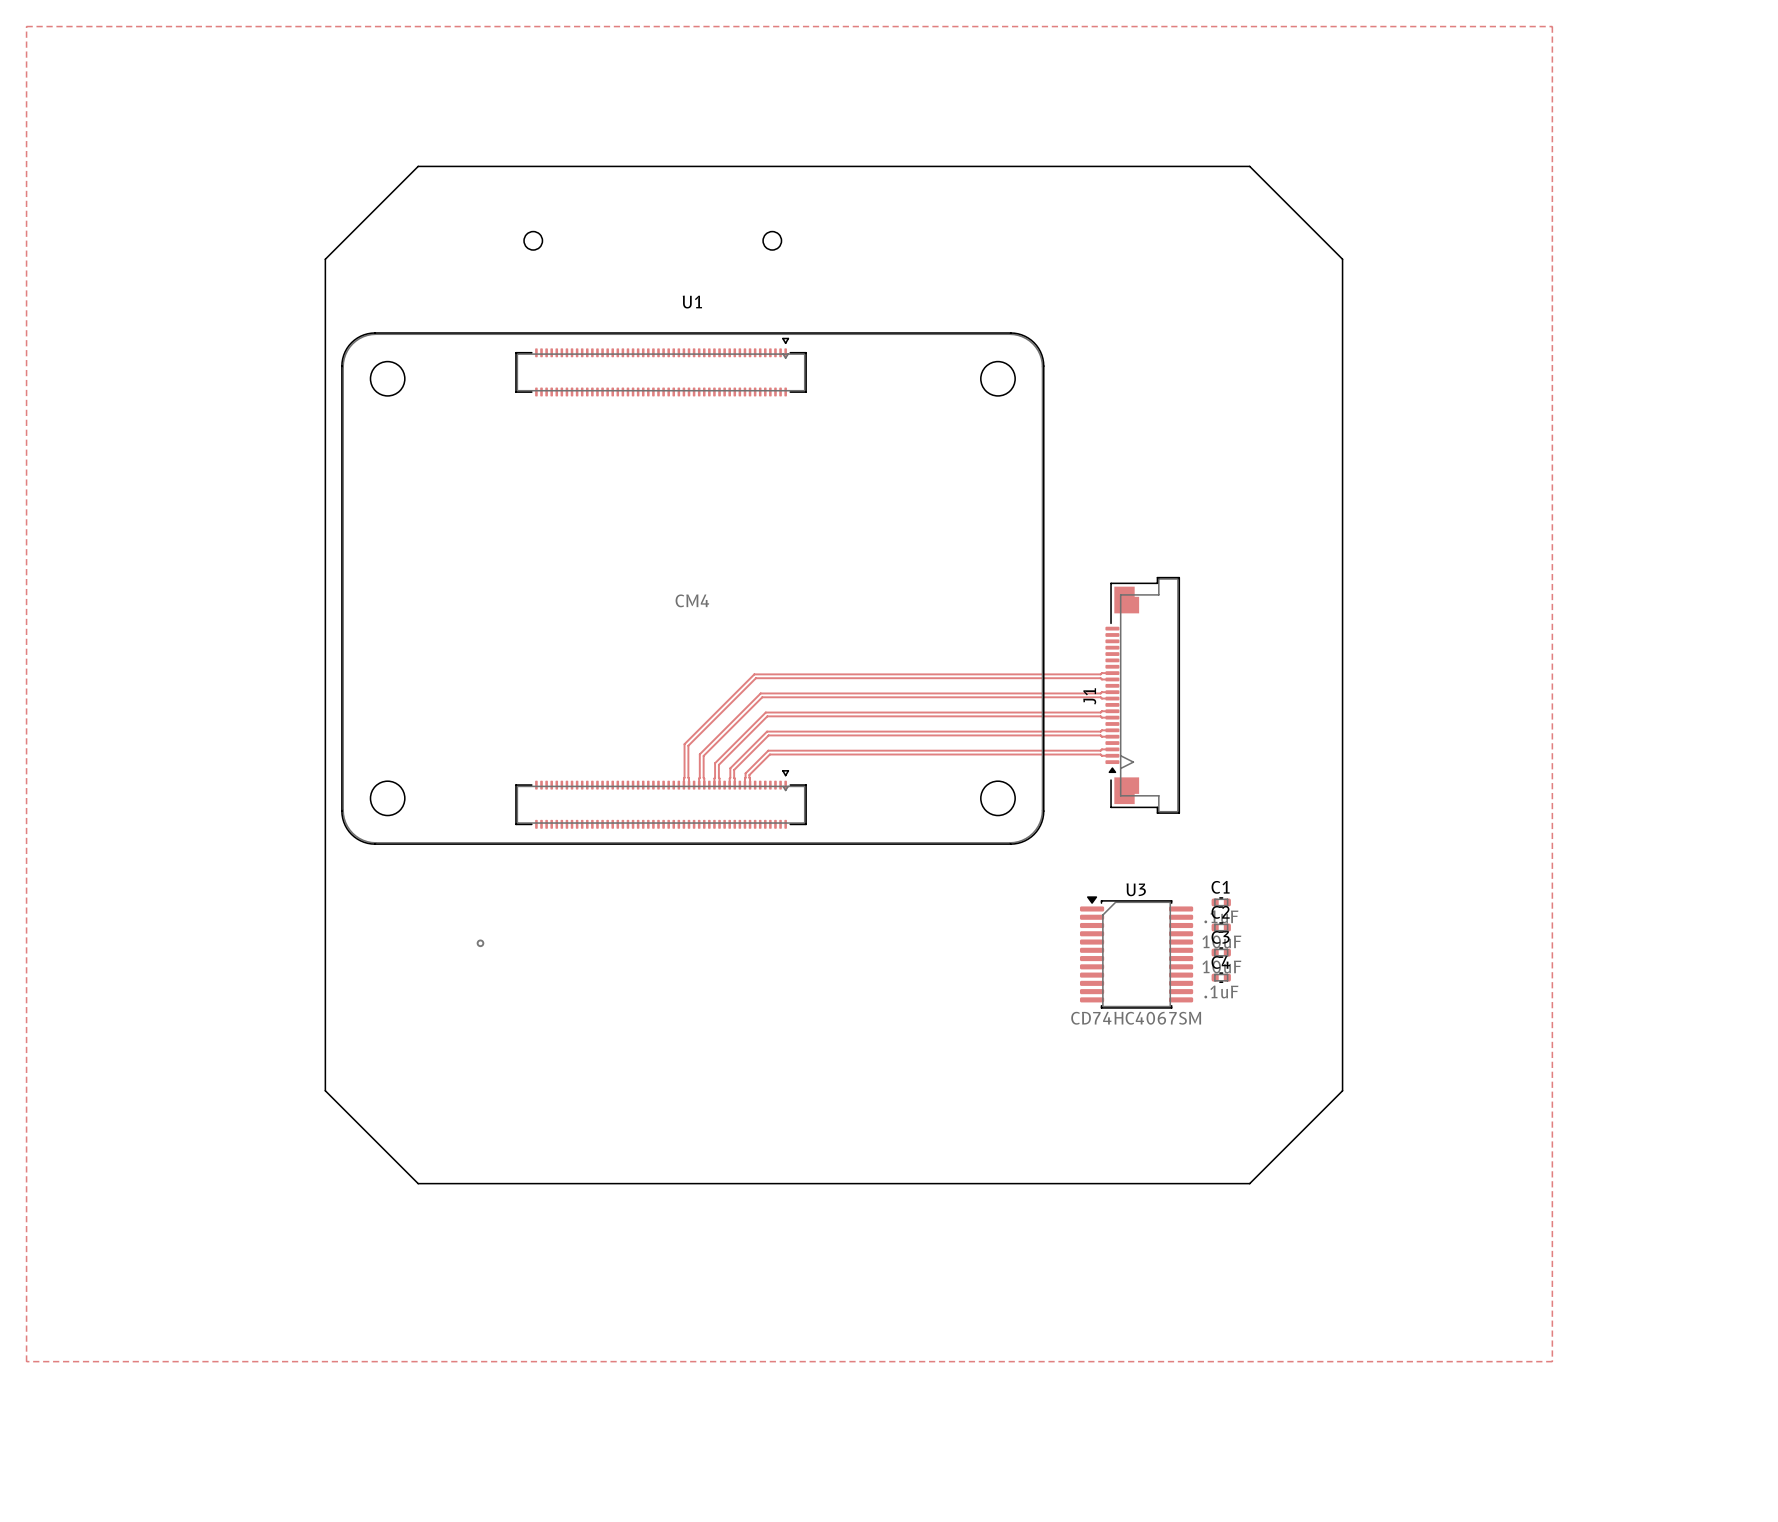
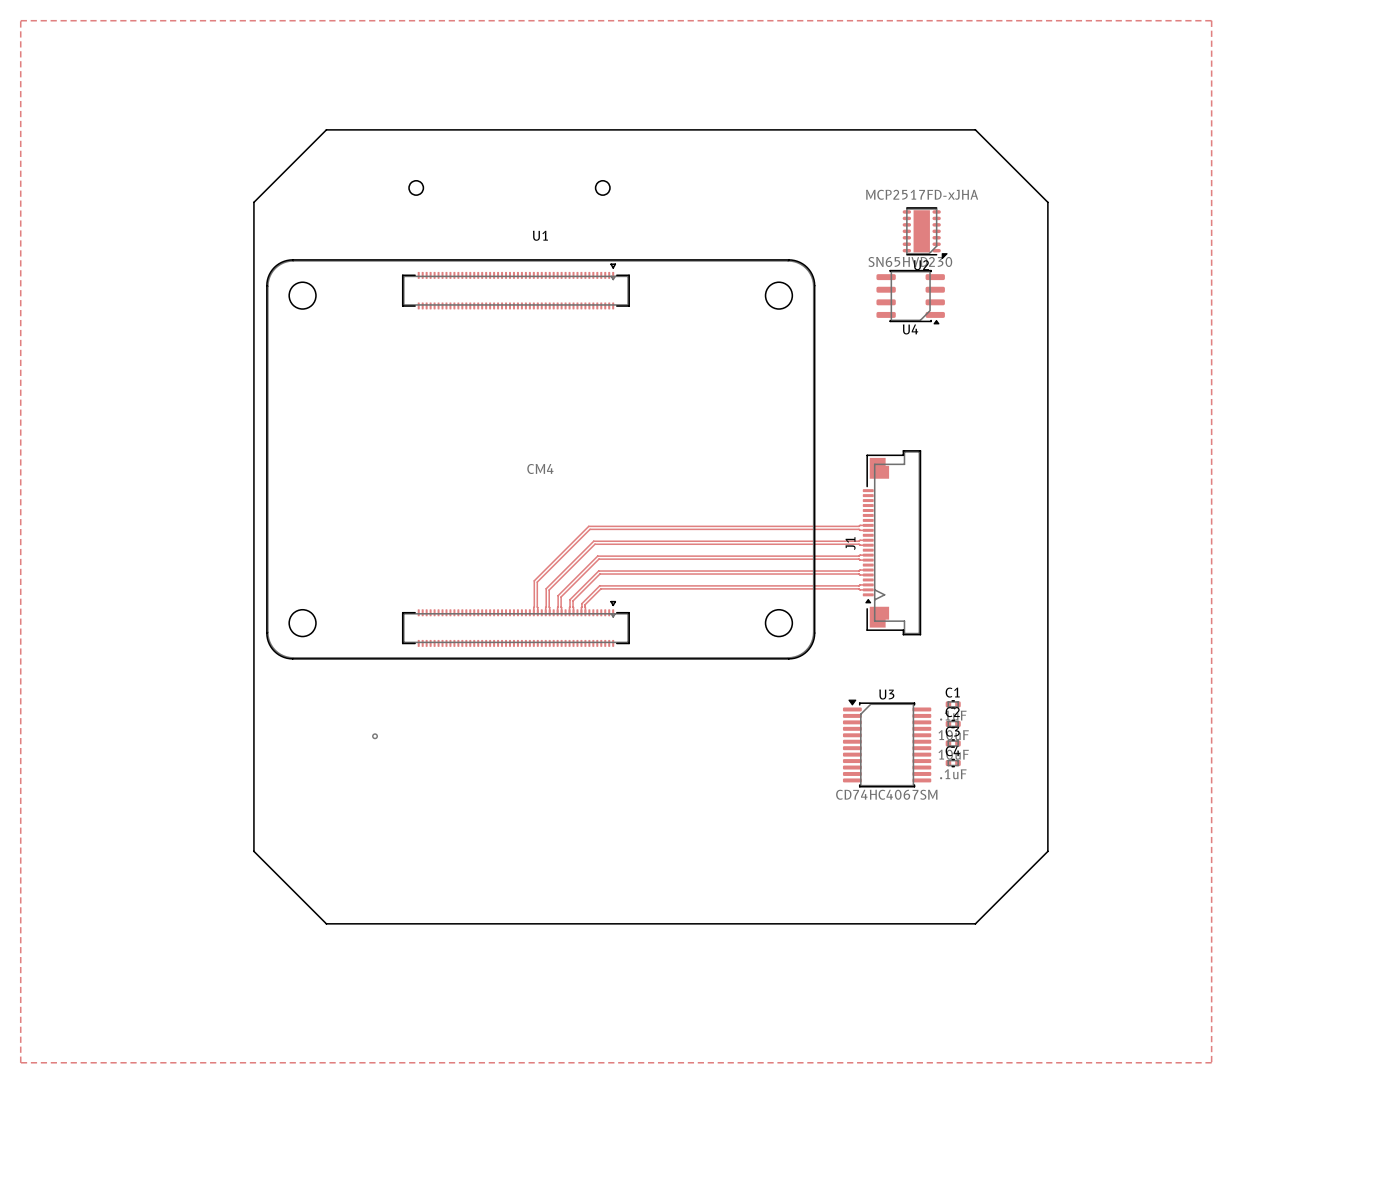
U2: none -> MCP2517FD-xJHA (925, 233)
U4: none -> SN65HVD230 (910, 297)

